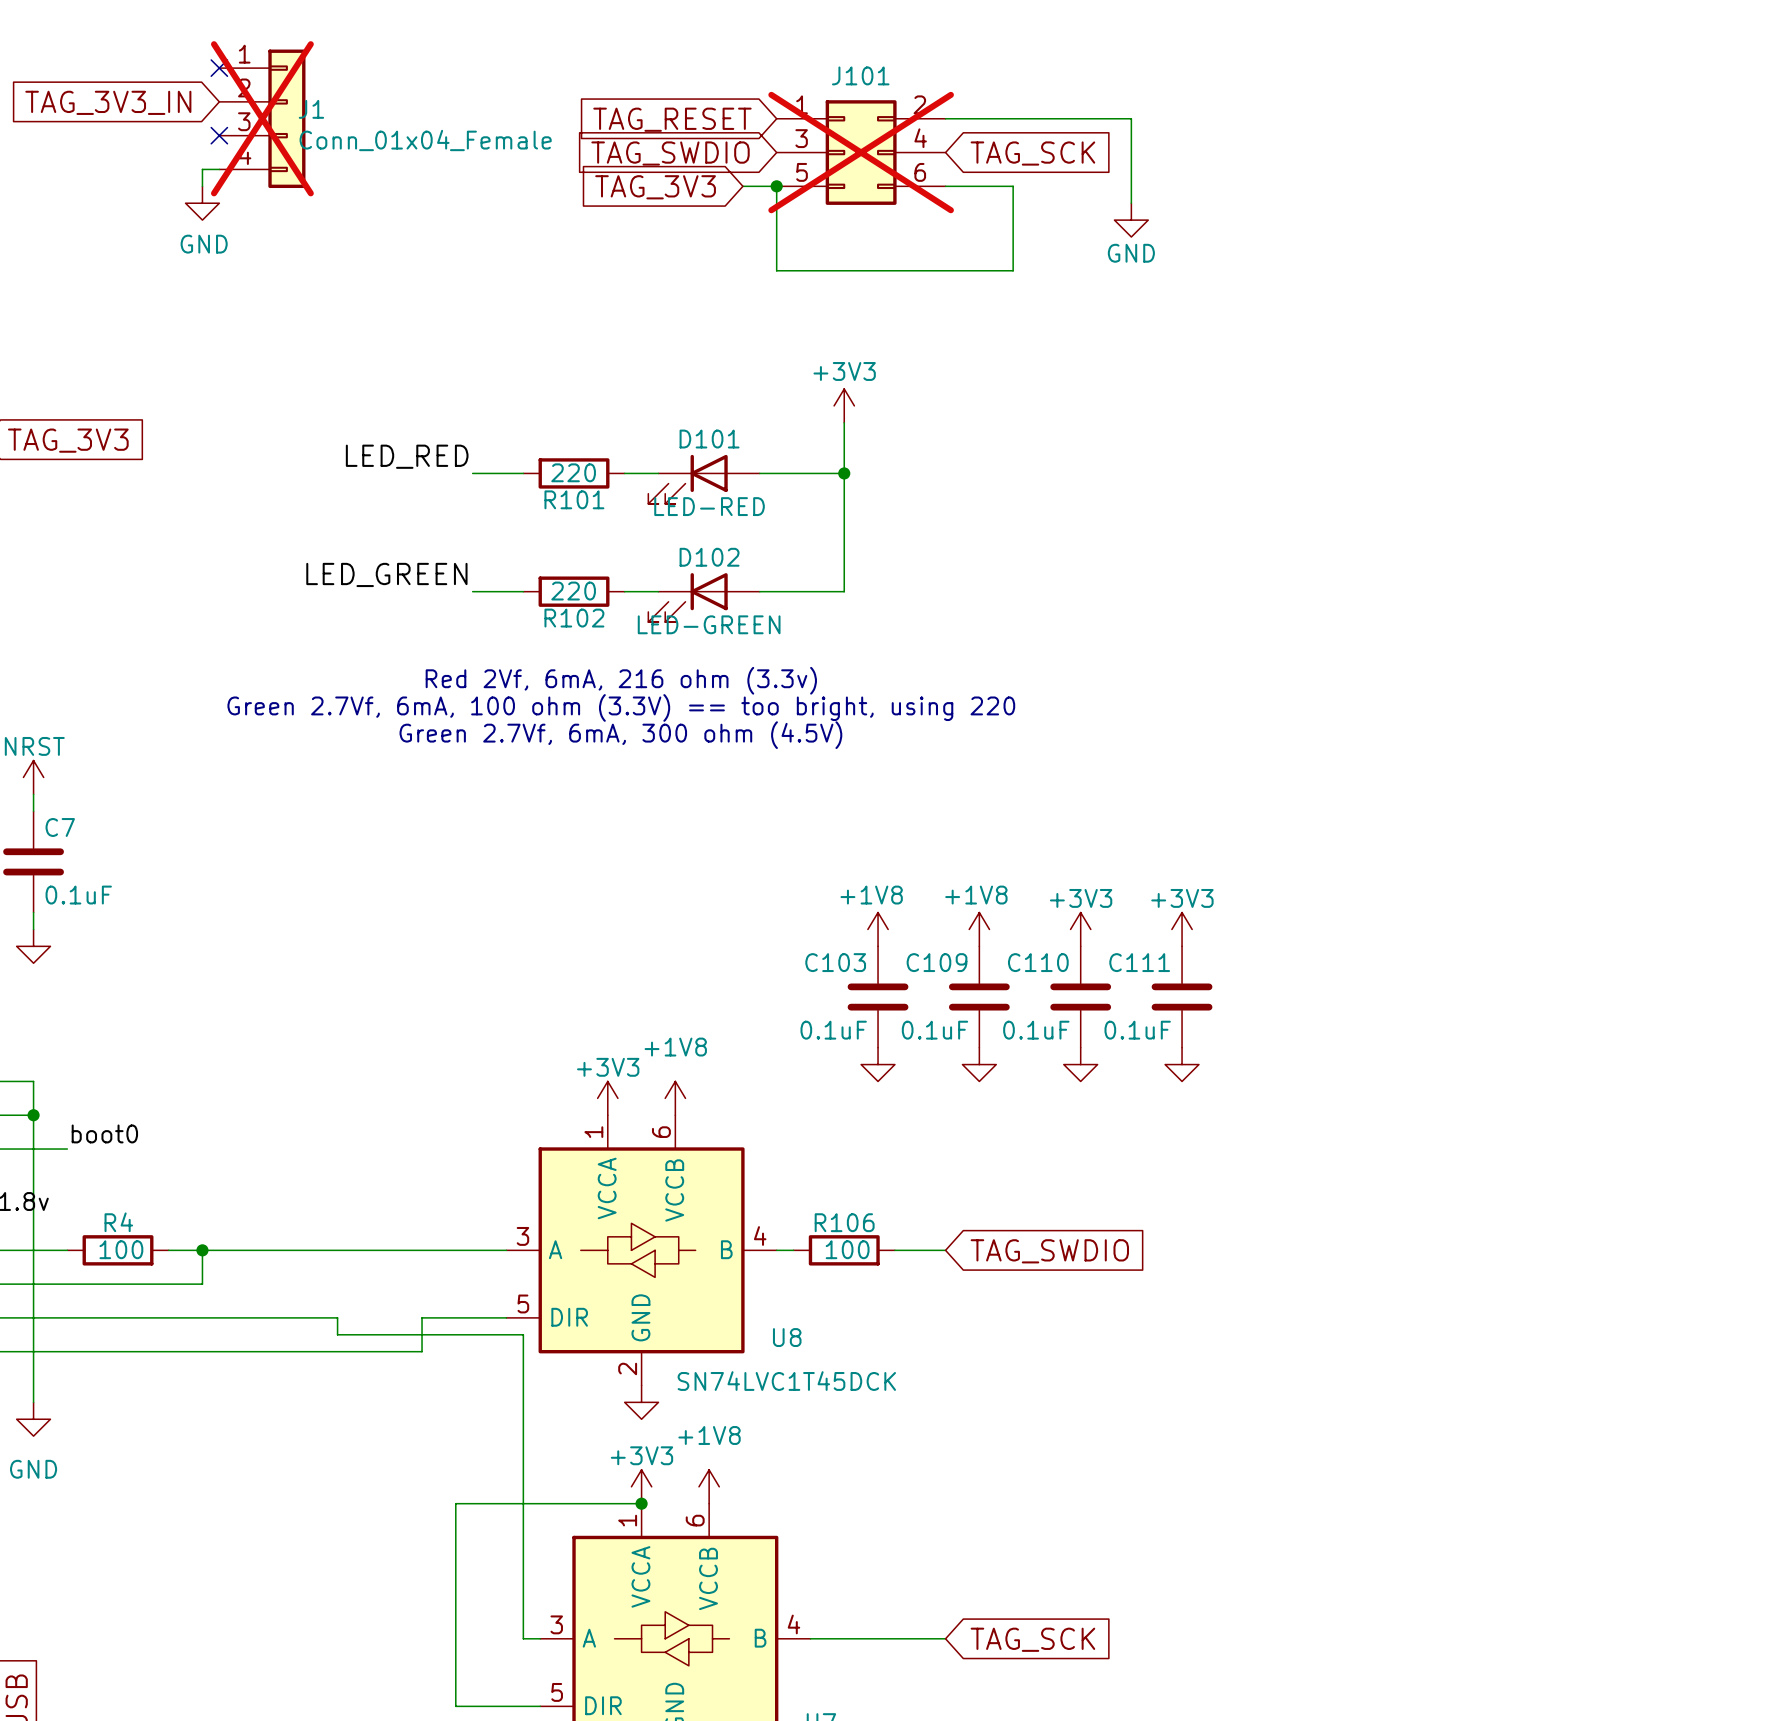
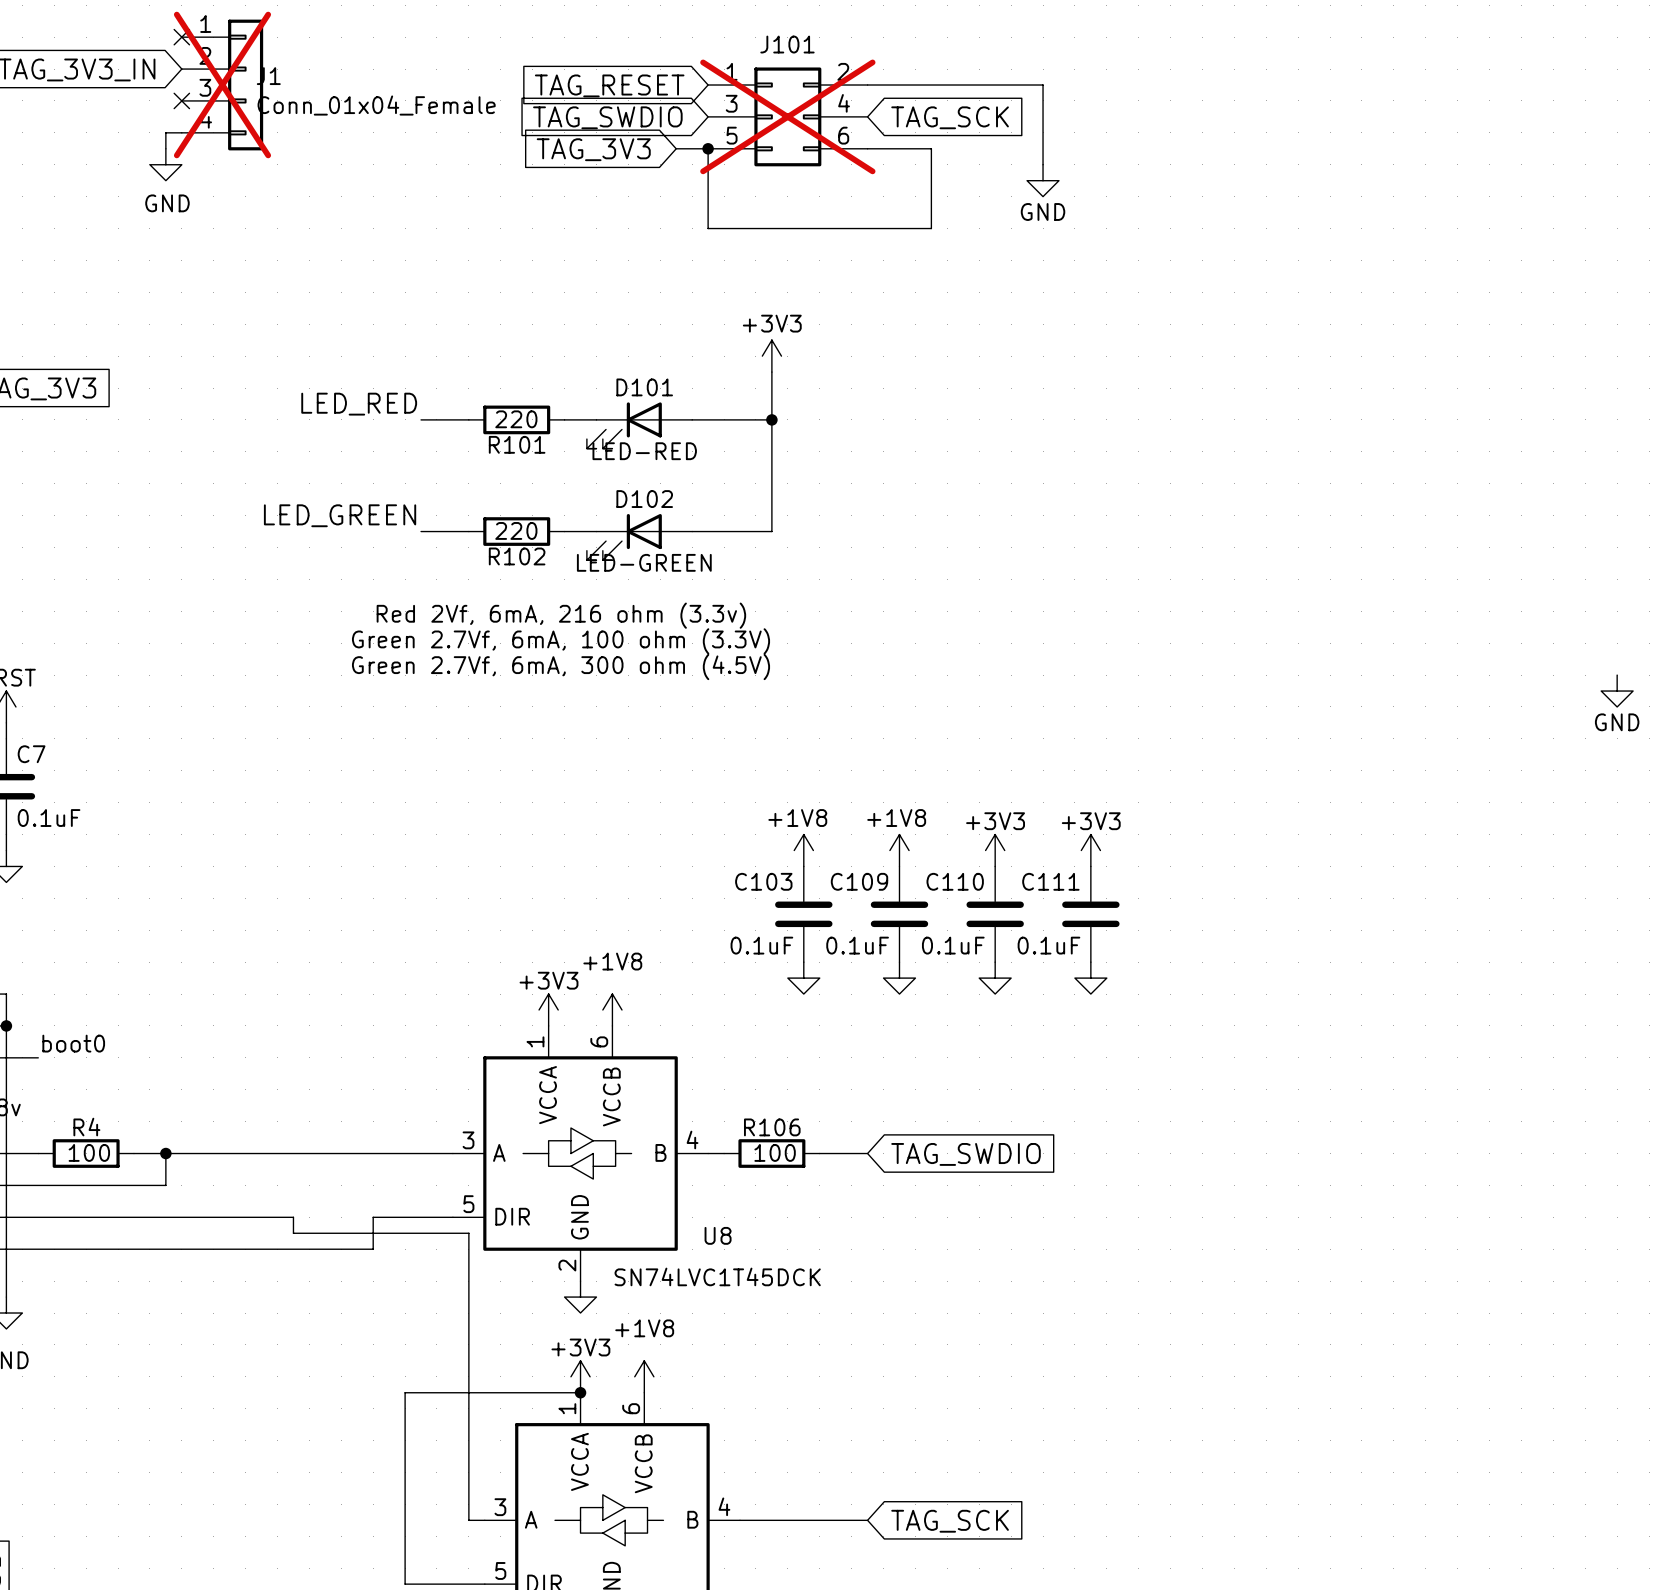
text: Green 2.7Vf, 6mA, 100 ohm (3.3V) == too bright, using 220 (621, 707) -> Green 2.7Vf, 6mA, 100 ohm (3.3V) (561, 641)
power symbol: none -> GND (1617, 691)

